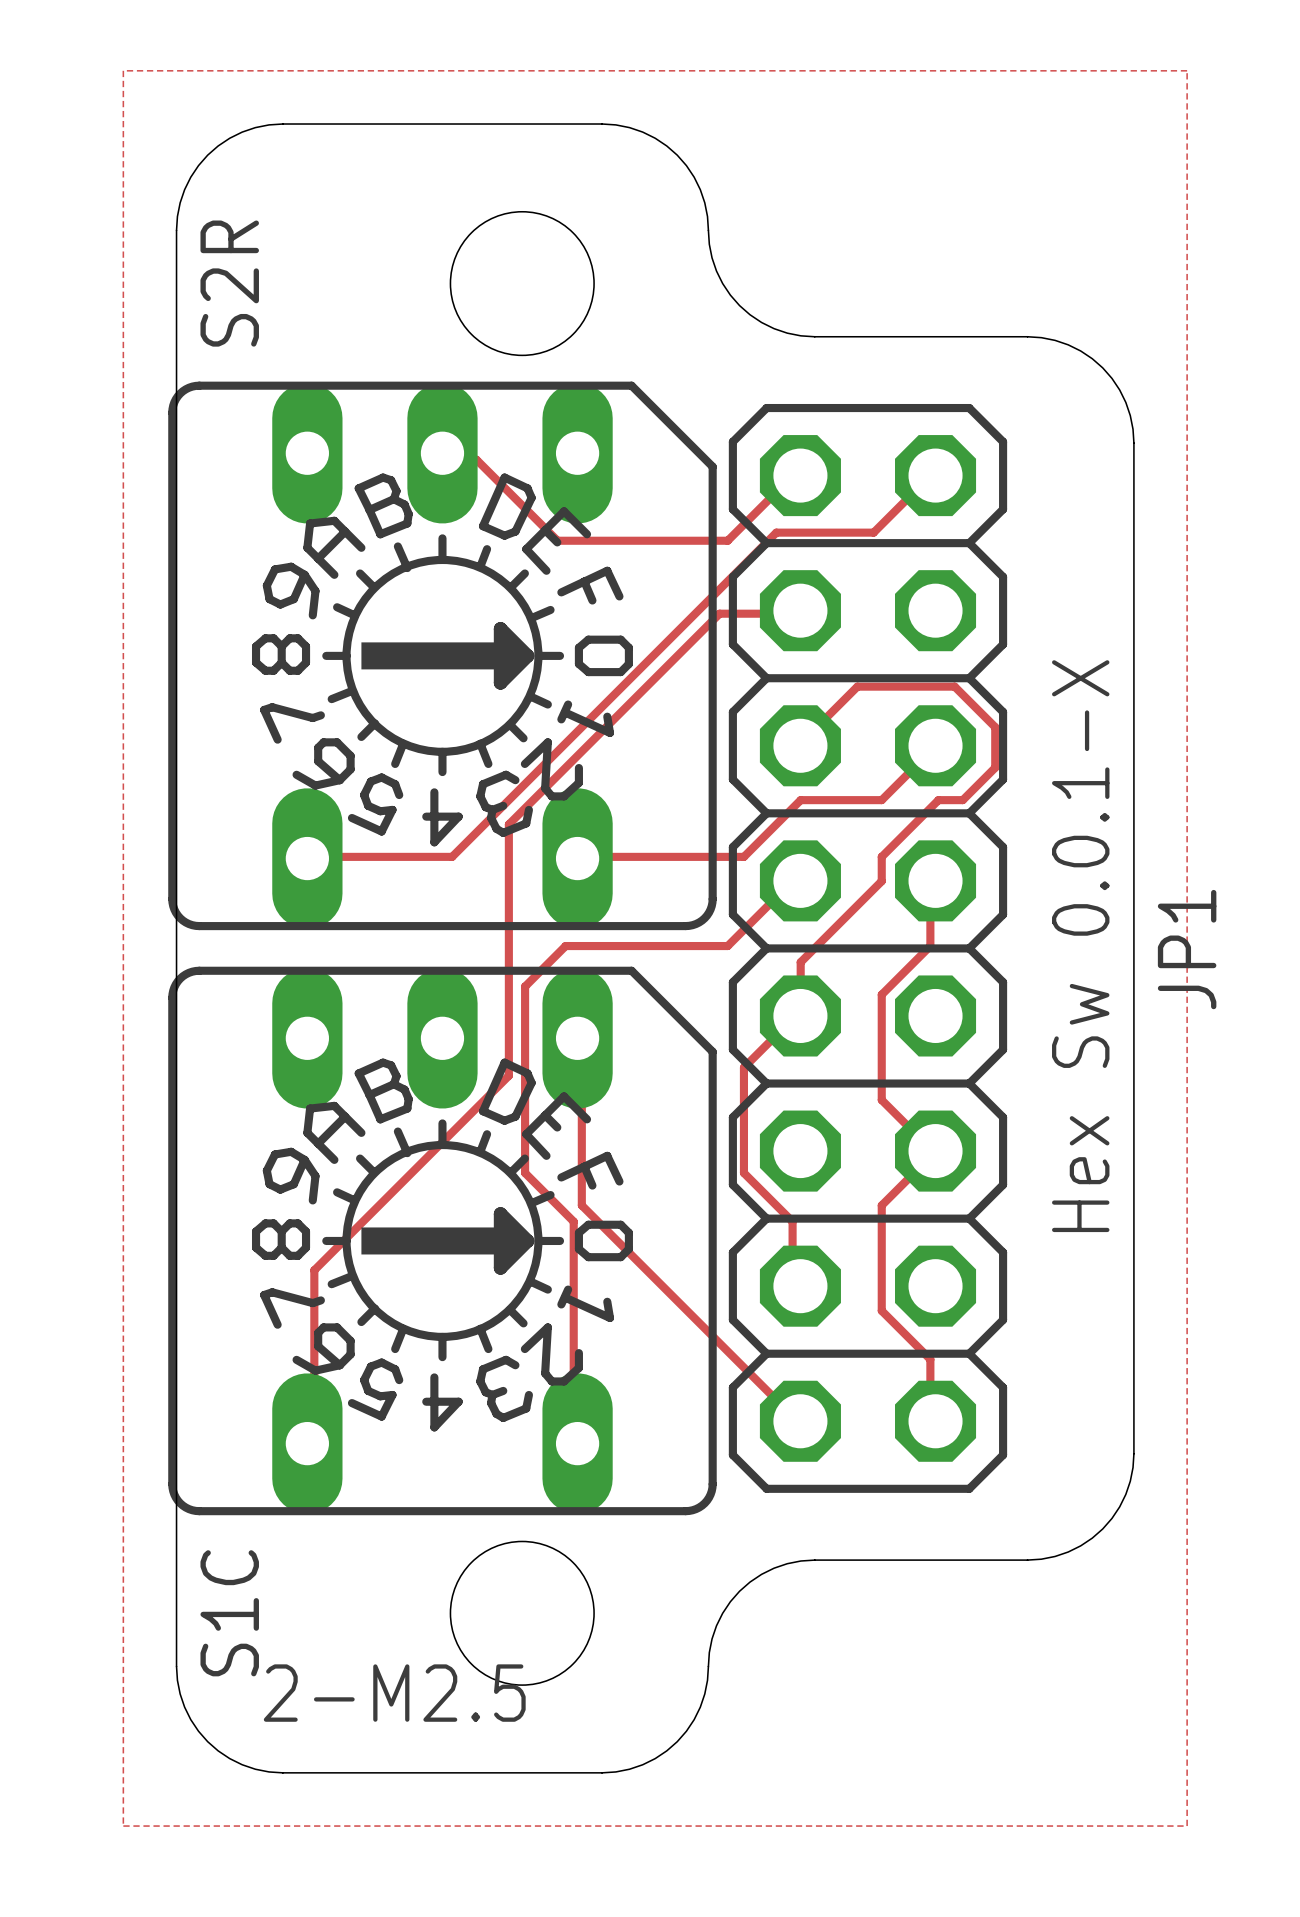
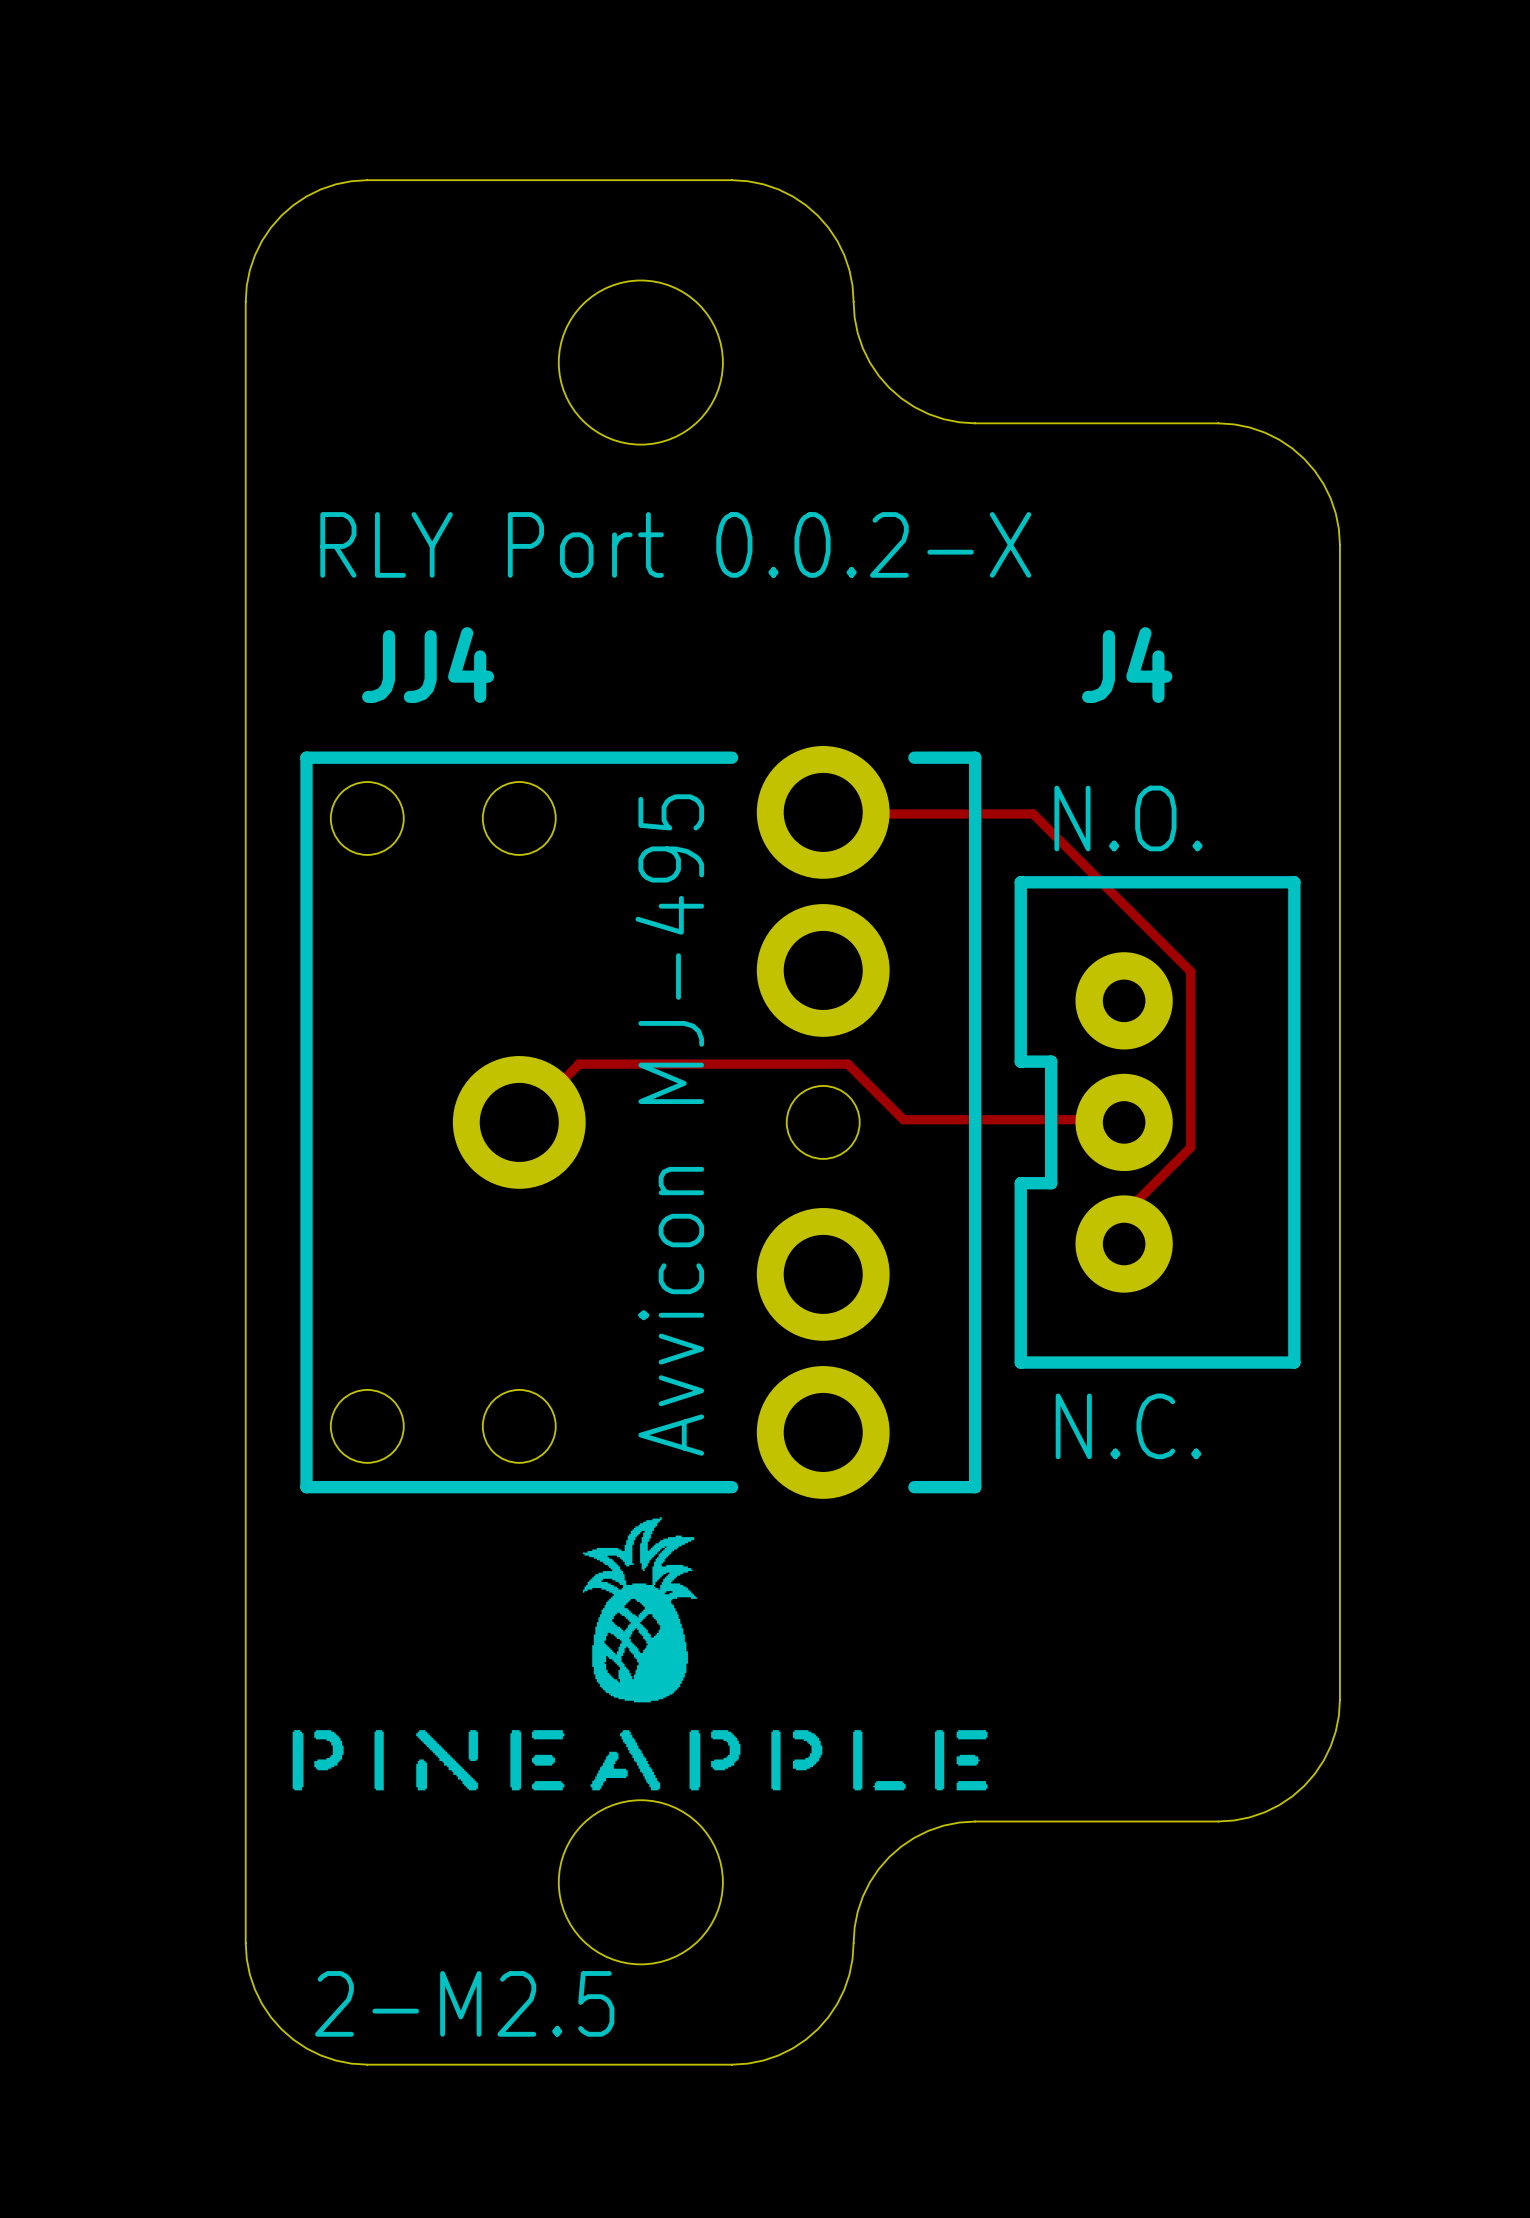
zone outline: (123, 70) (1187, 70) (1187, 1826) (123, 1826) (123, 70) -> none
text: none -> RLY Port 0.0.2-X (675, 544)
track: (442, 453) (444, 459) (476, 459) (557, 540) (727, 540) (792, 475) (800, 475) -> none
track: (935, 475) (930, 475) (873, 532) (776, 532) (452, 856) (314, 856) (307, 858) -> none
track: (800, 610) (792, 613) (719, 613) (508, 824) (508, 1075) (314, 1270) (314, 1440) (307, 1443) -> none
S2R: (442, 655) -> none
track: none -> (823, 812) (829, 813) (1033, 813) (1190, 971) (1190, 1147) (1125, 1212) (1124, 1244)
text: none -> N.O. (1128, 818)
track: (800, 745) (857, 686) (954, 686) (995, 727) (995, 767) (962, 800) (938, 800) (881, 856) (881, 881) (800, 962) (800, 1015) (792, 1019) (743, 1067) (743, 1173) (792, 1221) (792, 1278) (800, 1286) -> none
track: (935, 745) (881, 800) (800, 800) (743, 856) (581, 856) (577, 858) -> none
track: (800, 880) (792, 881) (727, 946) (565, 946) (525, 986) (525, 1173) (573, 1221) (573, 1440) (577, 1443) -> none
track: (935, 880) (930, 881) (930, 946) (881, 994) (881, 1100) (930, 1148) (935, 1151) (881, 1205) (881, 1310) (930, 1359) (930, 1416) (935, 1421) -> none
text: Hex Sw 0.0.1-X (1080, 946) -> none
track: none -> (519, 1122) (579, 1064) (847, 1064) (903, 1119) (1116, 1119) (1124, 1122)
JJ4: none -> (640, 1122)
JP1: (867, 948) -> none
J4: none -> (1157, 1122)
text: none -> Avvicon MJ-495 (669, 1125)
track: (577, 1038) (581, 1043) (581, 1205) (792, 1416) (800, 1421) -> none
text: none -> N.C. (1128, 1426)
S1C: (442, 1240) -> none
drawing: none -> [292, 1517, 988, 1791]
text position: 2-M2.5 (394, 1693) -> 2-M2.5 (464, 2003)

